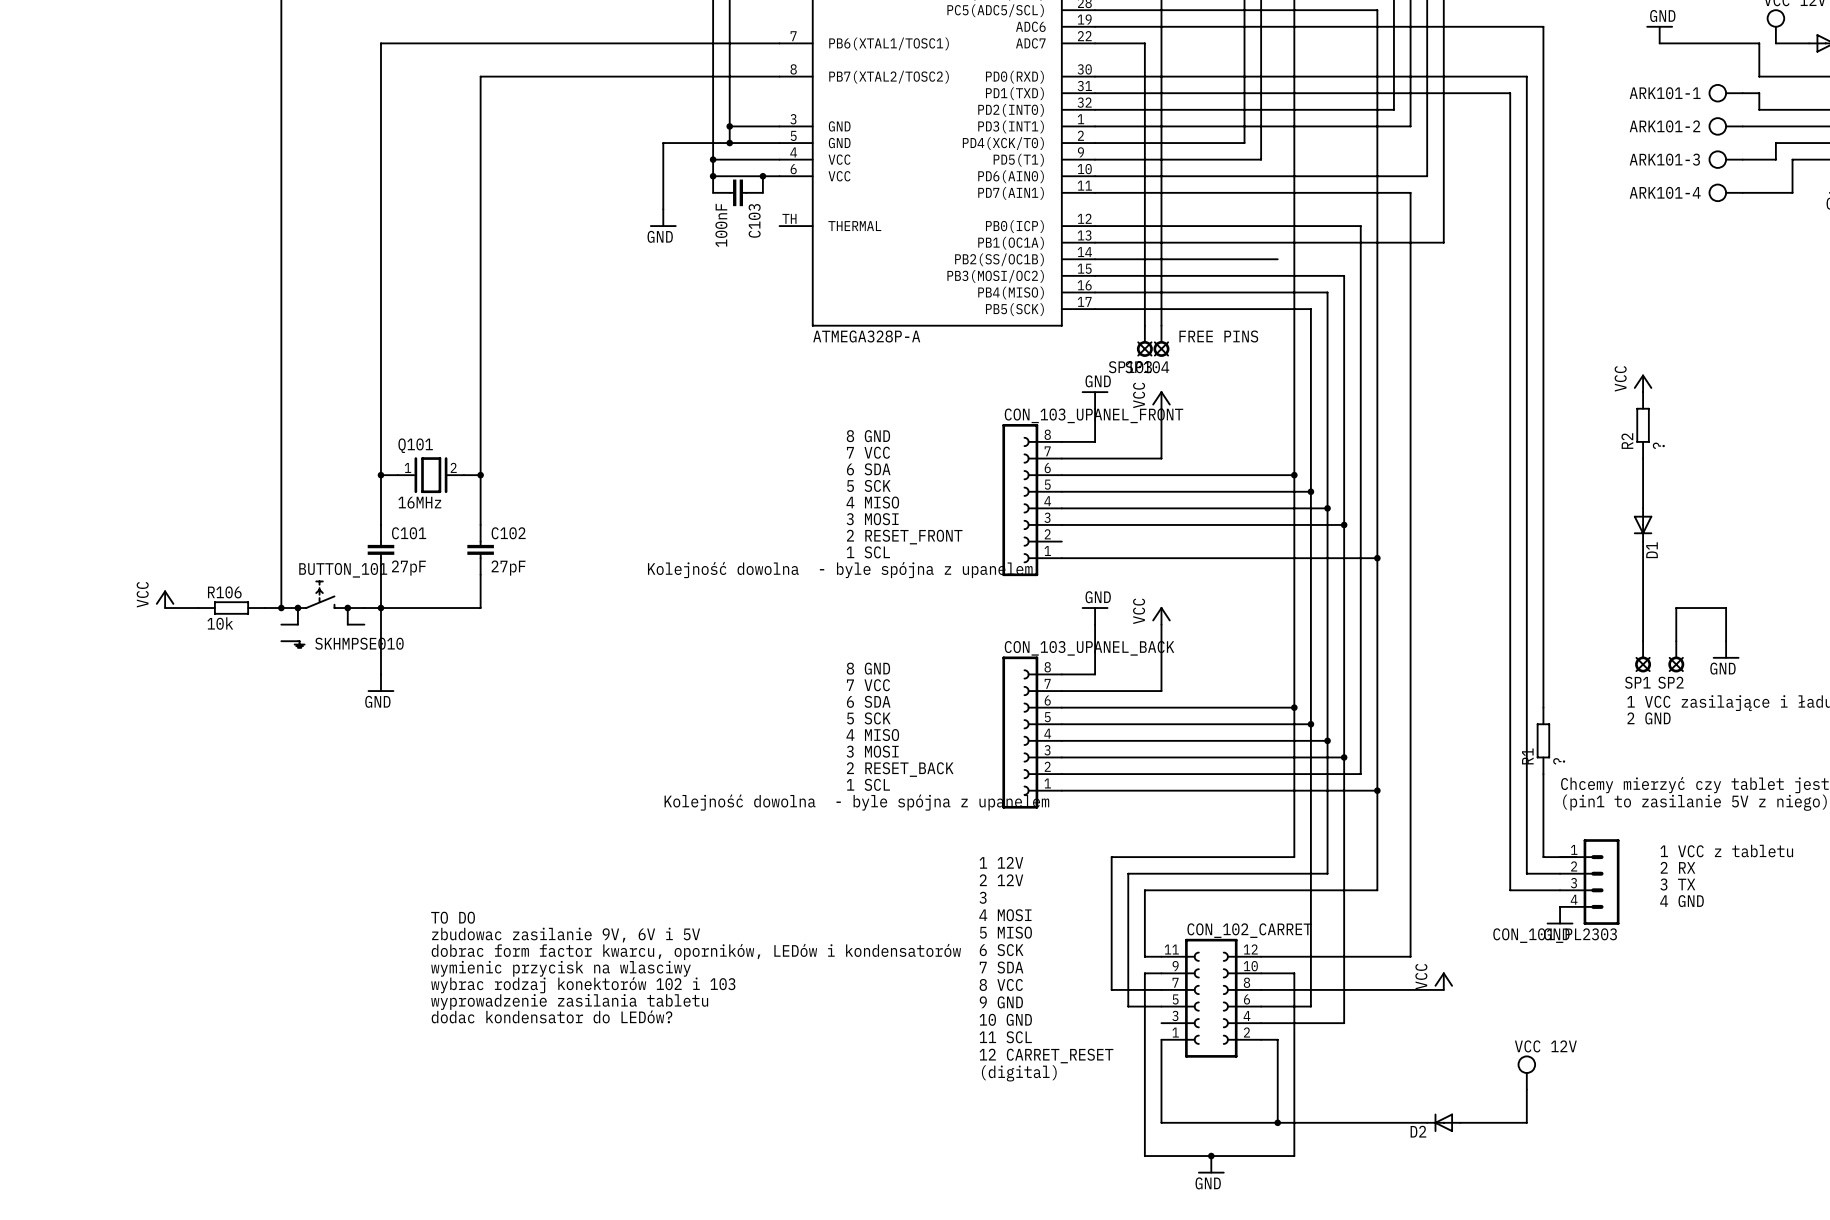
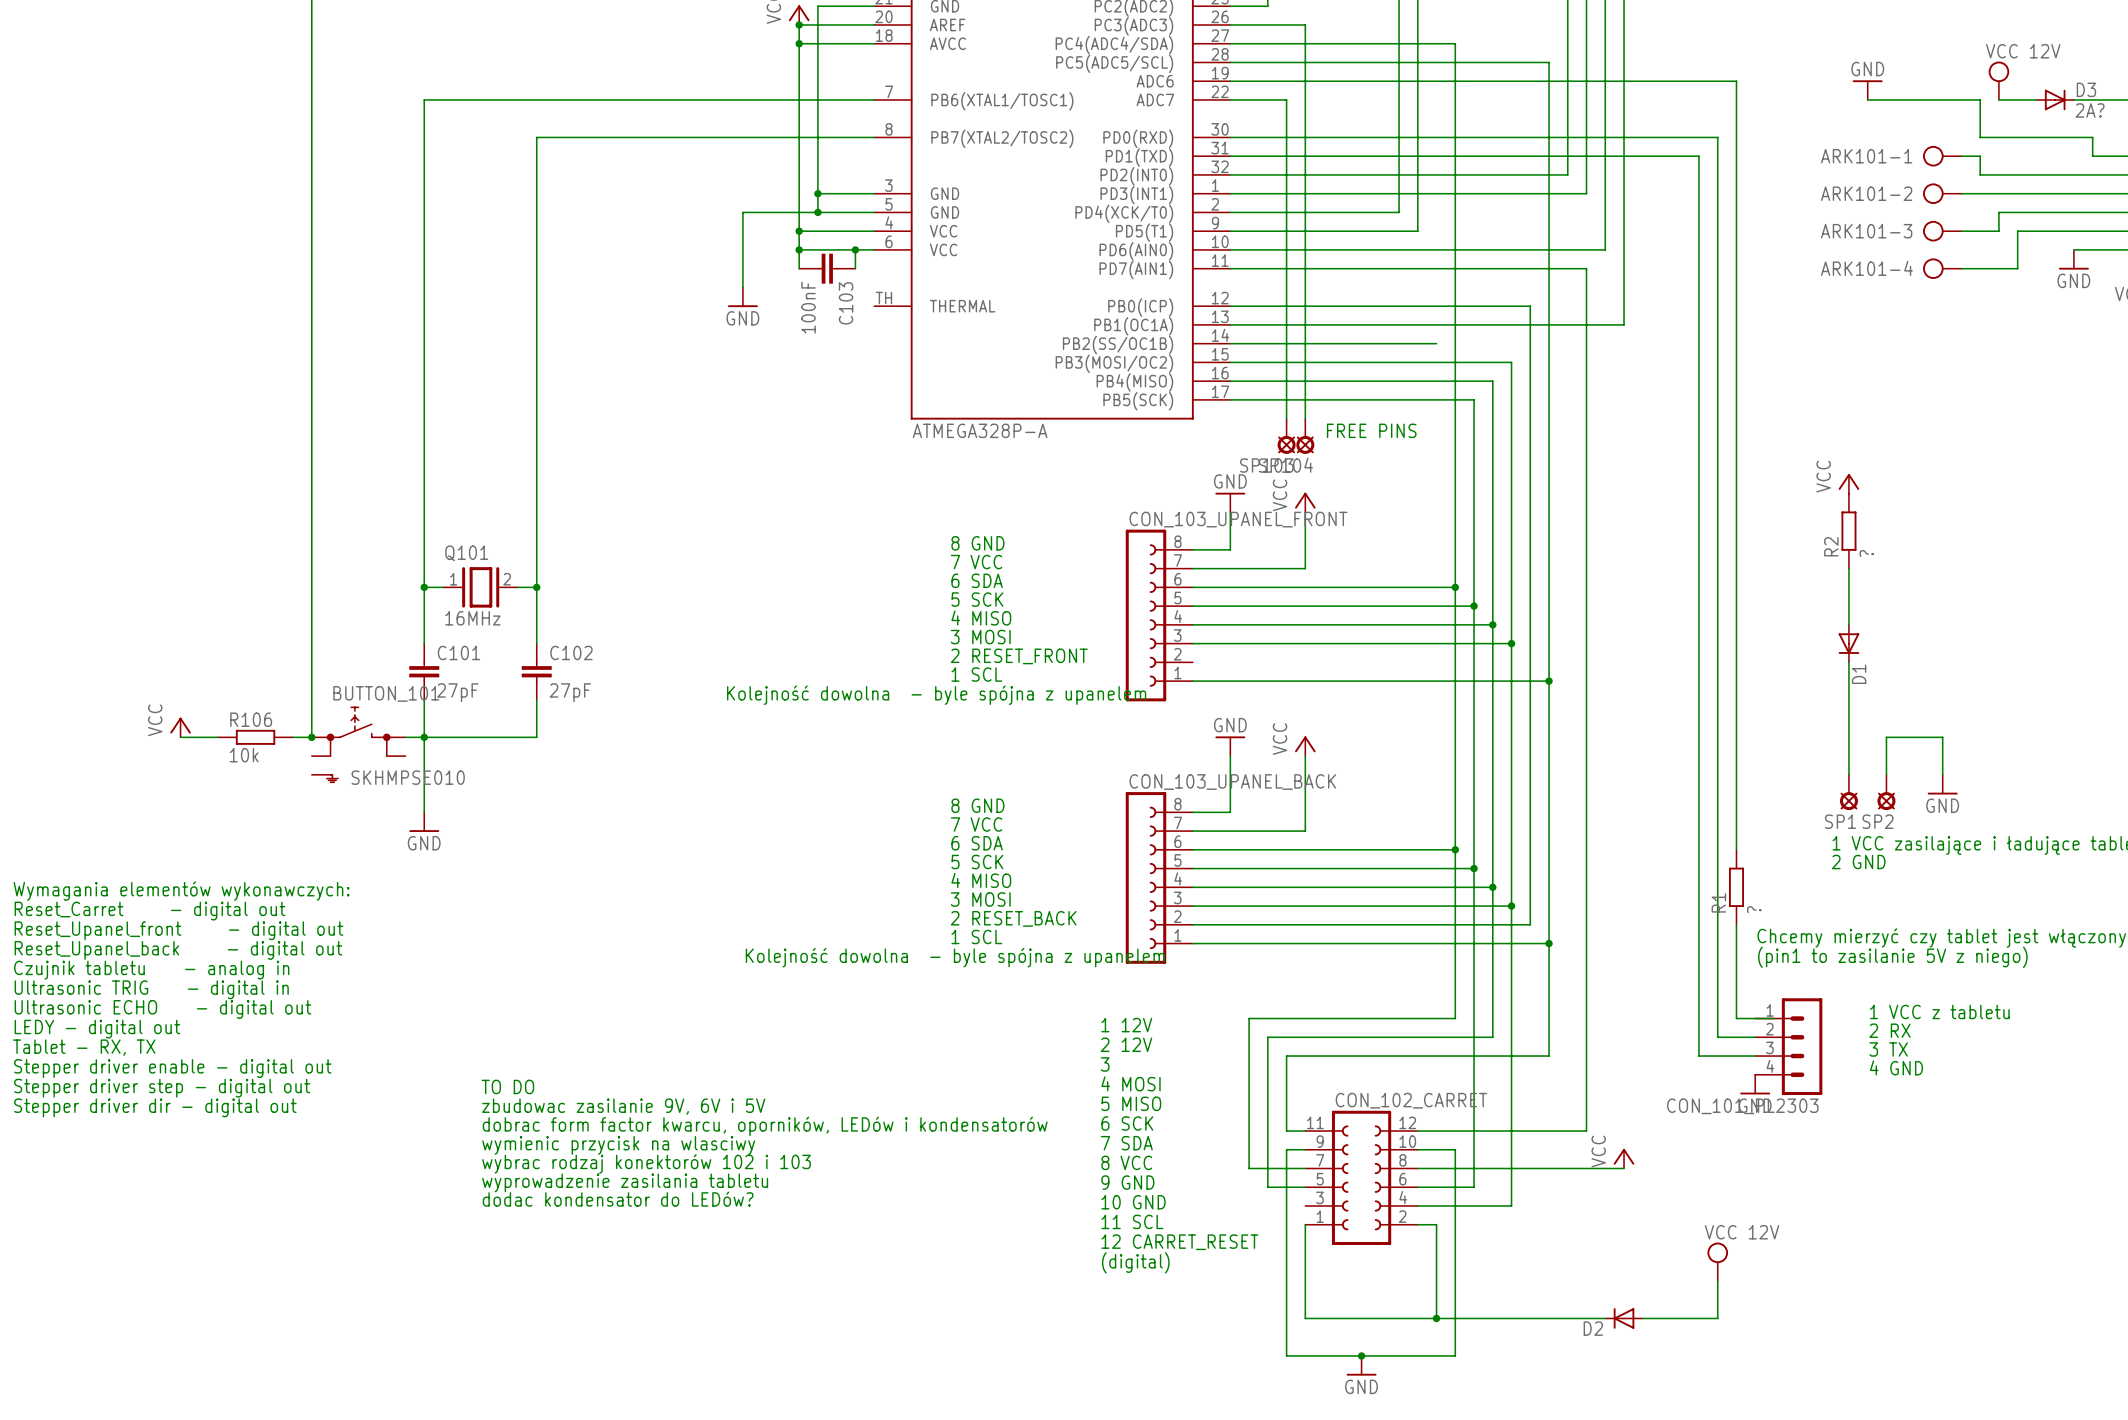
text: none -> Wymagania elementów wykonawczych: (181, 891)
text: none -> Reset_Carret - digital out (150, 911)
text: none -> Reset_Upanel_front - digital out (179, 930)
text: none -> Reset_Upanel_back - digital out (178, 950)
text: none -> Czujnik tabletu - analog in (151, 970)
text: none -> Ultrasonic TRIG - digital in (151, 989)
text: none -> Ultrasonic ECHO - digital out (162, 1009)
text: none -> LEDY - digital out (97, 1029)
text: none -> Tablet - RX, TX (84, 1047)
text: none -> Stepper driver enable - digital out (172, 1068)
text: none -> Stepper driver step - digital out (162, 1088)
text: none -> Stepper driver dir - digital out (155, 1107)

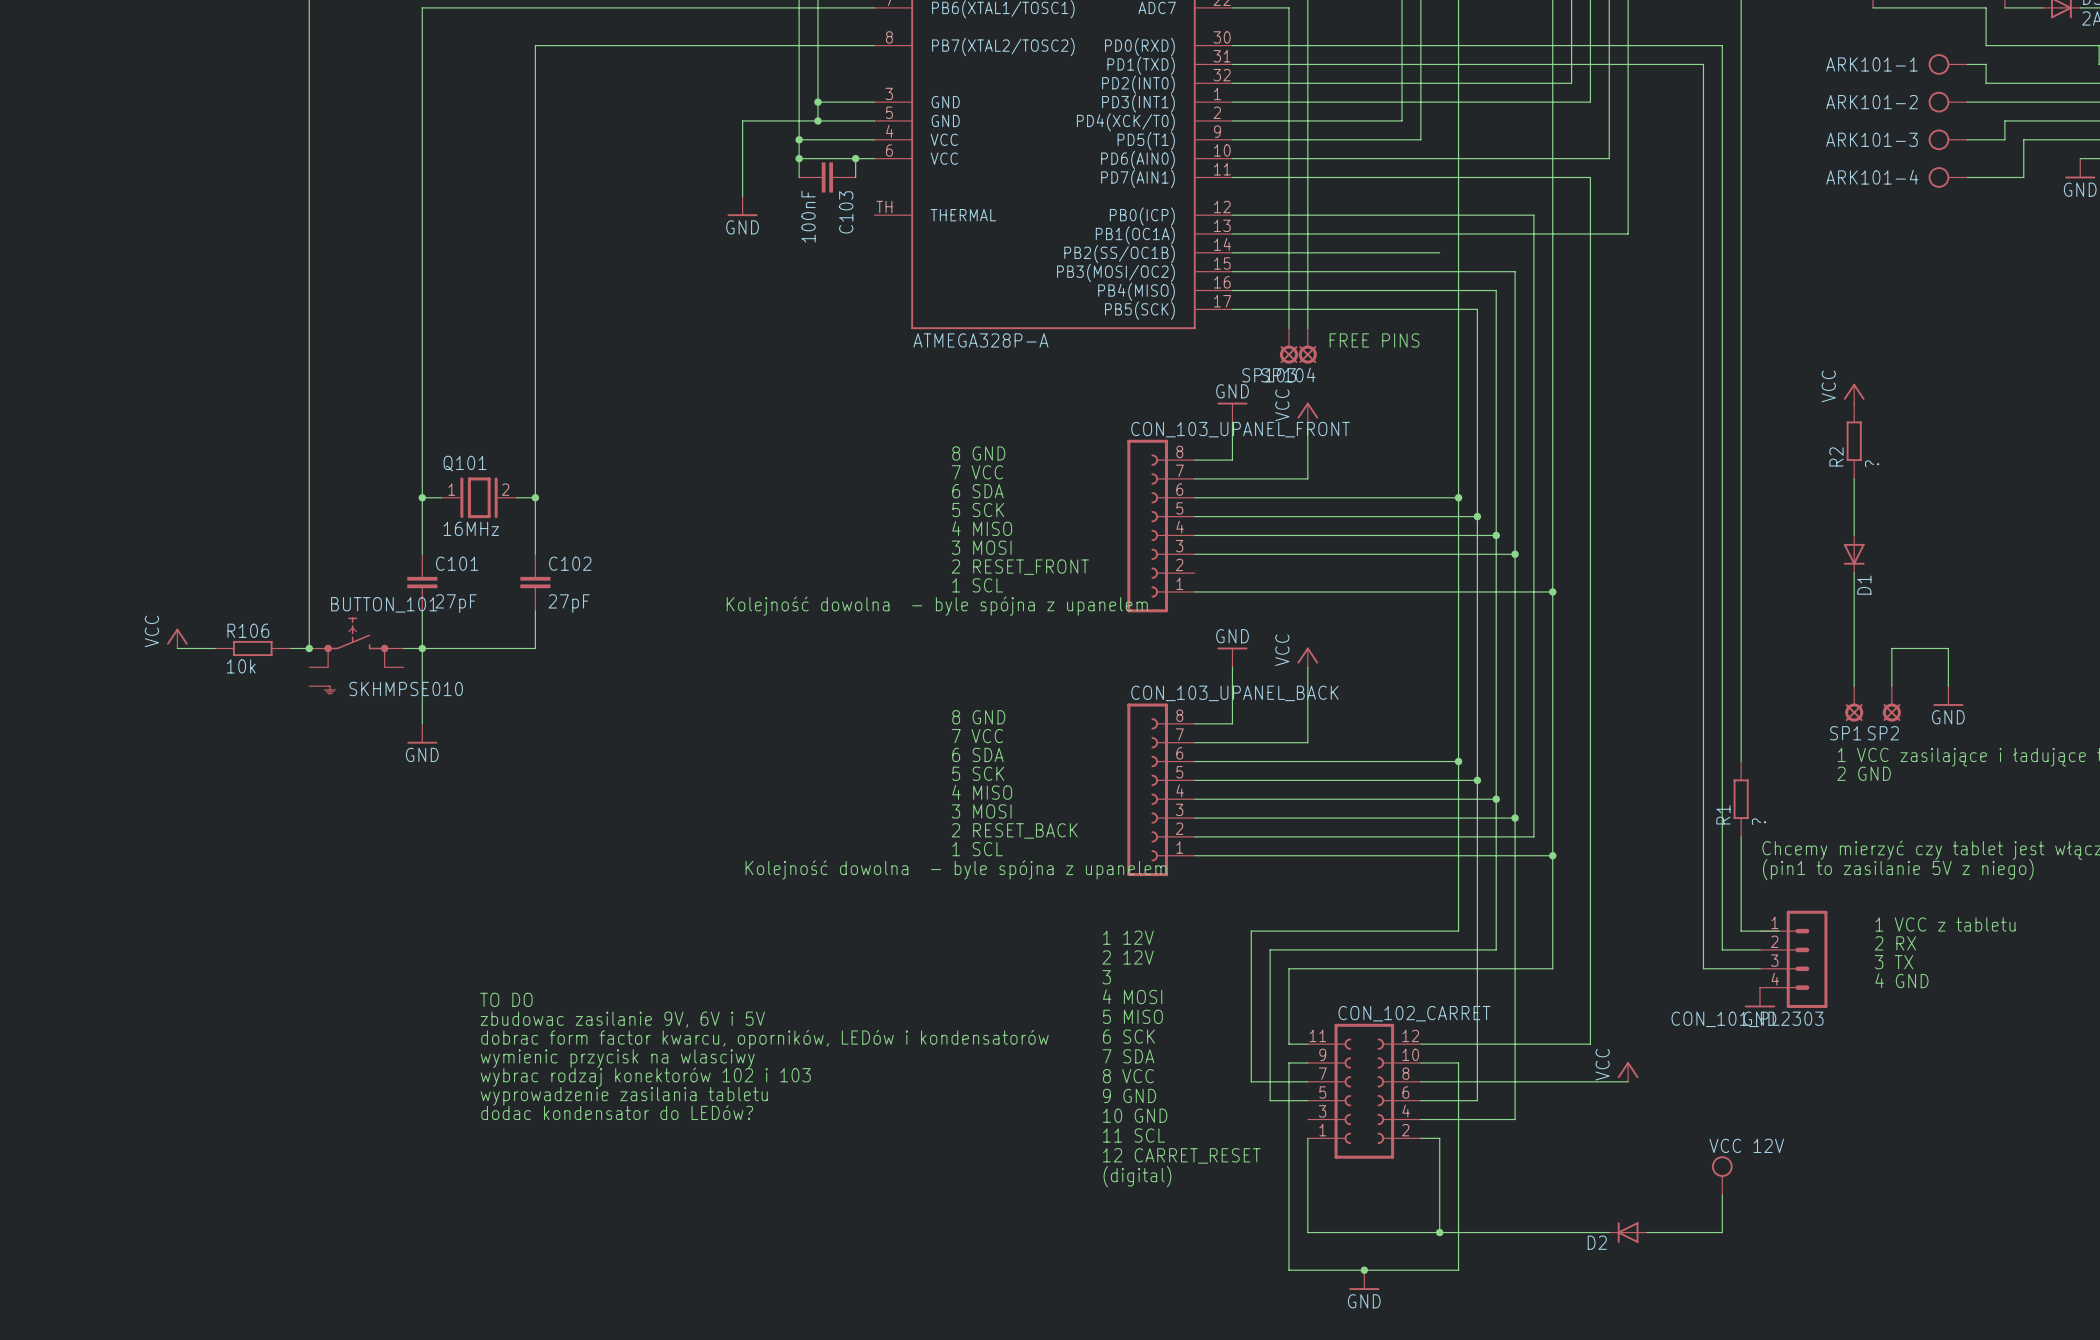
text: Wymagania elementów wykonawczych: (181, 891) -> none
text: Reset_Carret - digital out (150, 911) -> none
text: Reset_Upanel_front - digital out (179, 930) -> none
text: Reset_Upanel_back - digital out (178, 950) -> none
text: Czujnik tabletu - analog in (151, 970) -> none
text: Ultrasonic TRIG - digital in (151, 989) -> none
text: Ultrasonic ECHO - digital out (162, 1009) -> none
text: LEDY - digital out (97, 1029) -> none
text: Tablet - RX, TX (84, 1047) -> none
text: Stepper driver enable - digital out (172, 1068) -> none
text: Stepper driver step - digital out (162, 1088) -> none
text: Stepper driver dir - digital out (155, 1107) -> none

